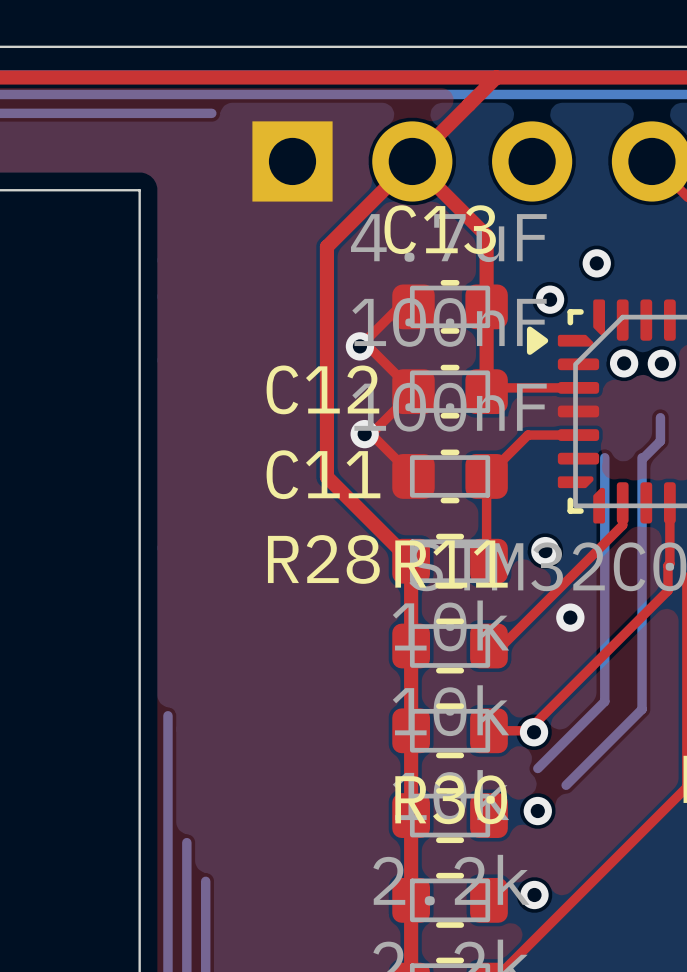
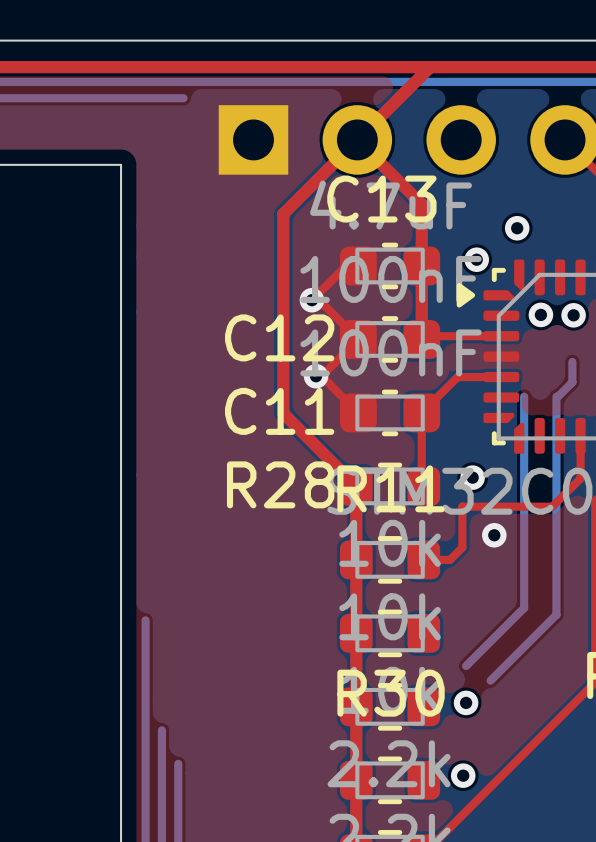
top track: (622, 502) (622, 525) (501, 646) -> (580, 478) (552, 506) (462, 506) (462, 547) (450, 559) (435, 559)
top track: (669, 552) (667, 590) (527, 730) (488, 730) -> none
via: (534, 732) -> none

